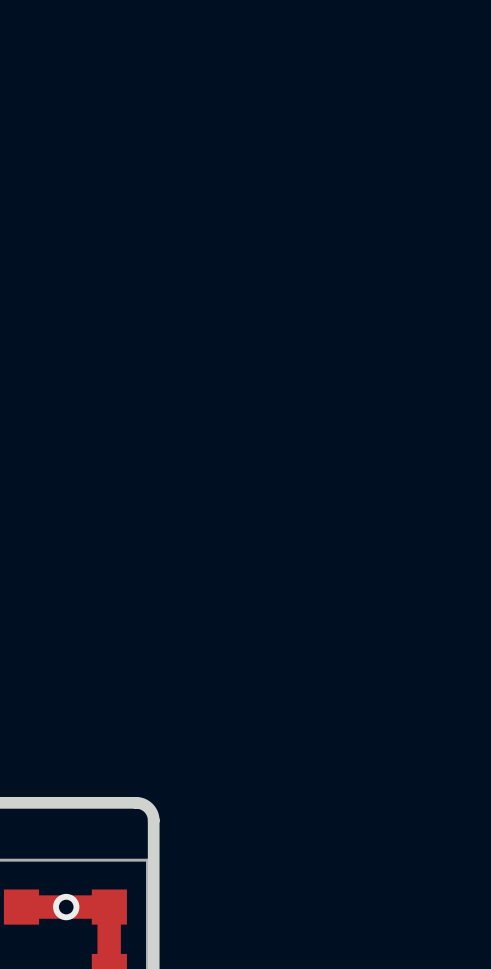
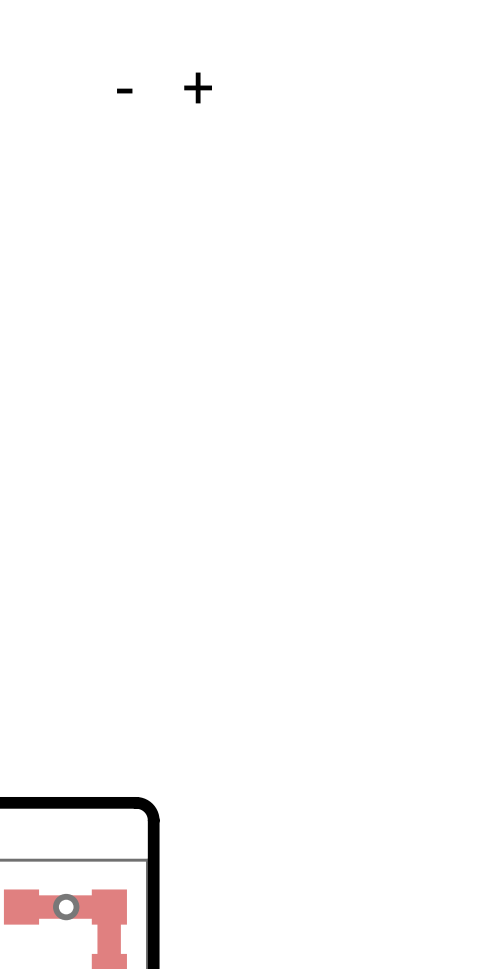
text: none -> - (124, 91)
text: none -> + (198, 87)

